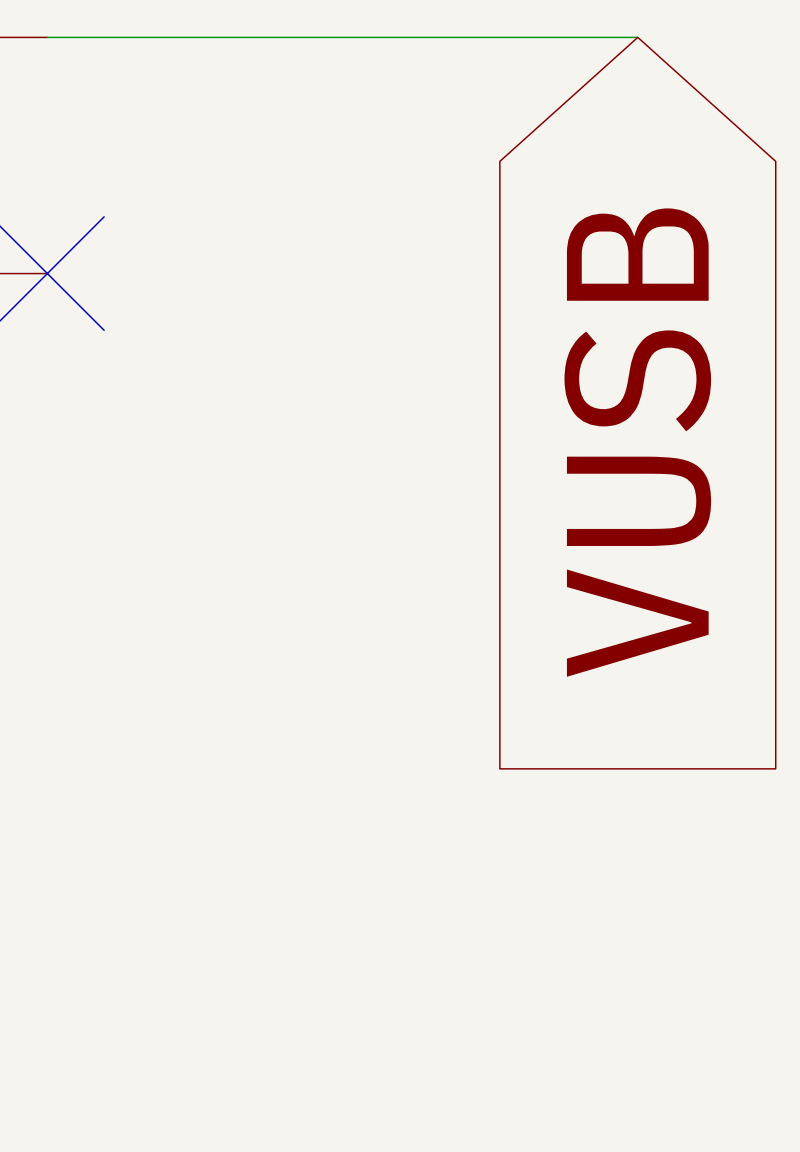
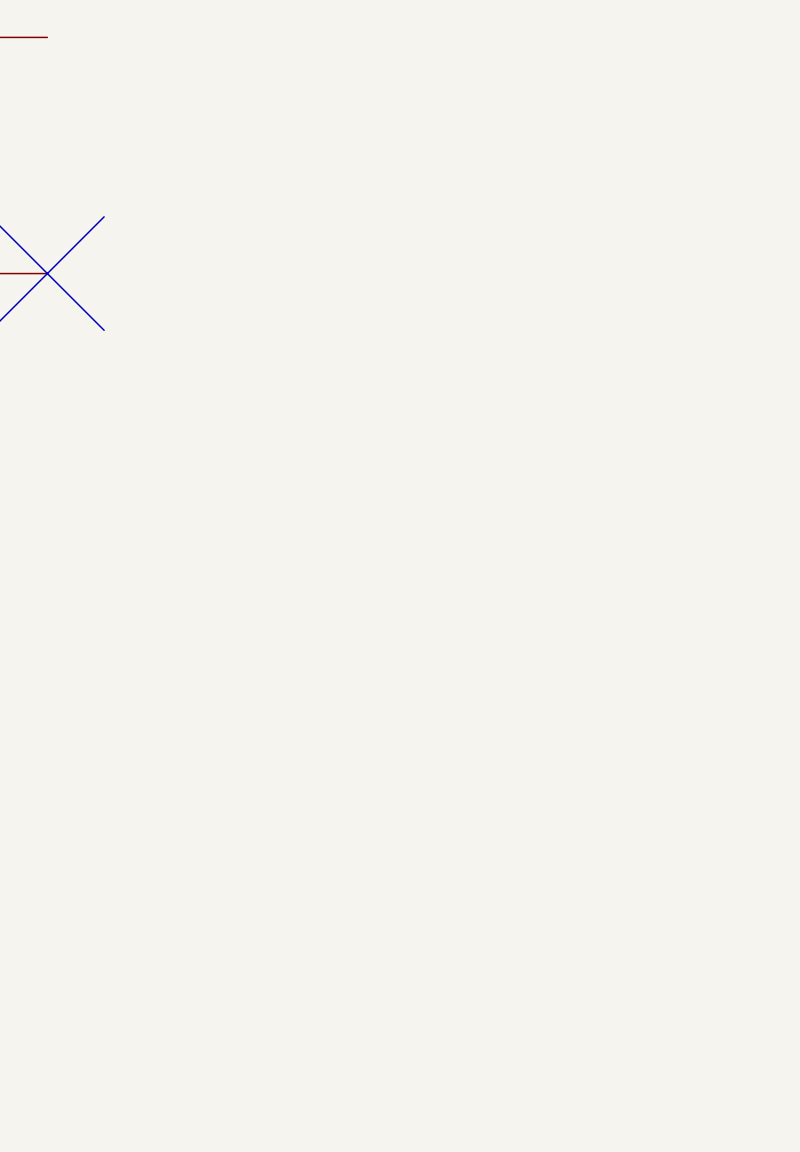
wire: (47, 37) (637, 37) -> none
global label: VUSB (637, 442) -> none

